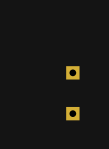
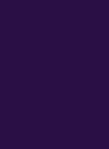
part: (72, 72) -> none
part: (72, 113) -> none

